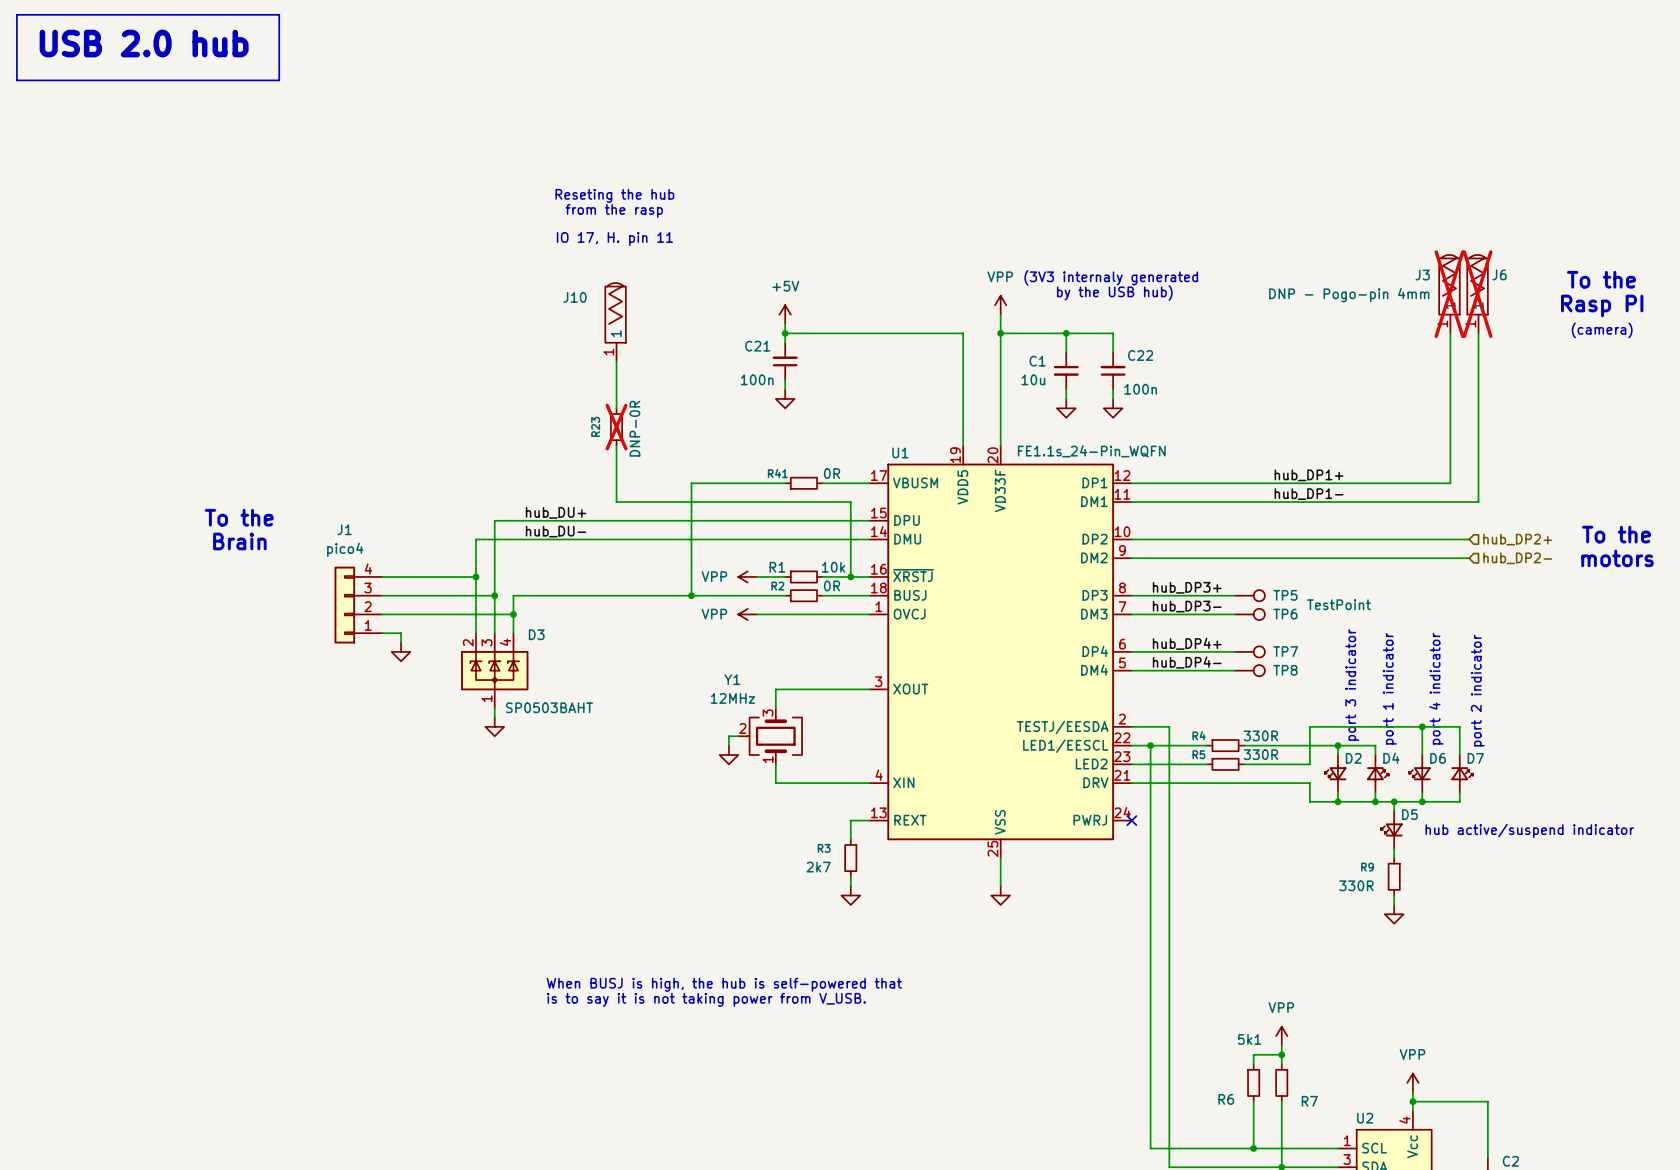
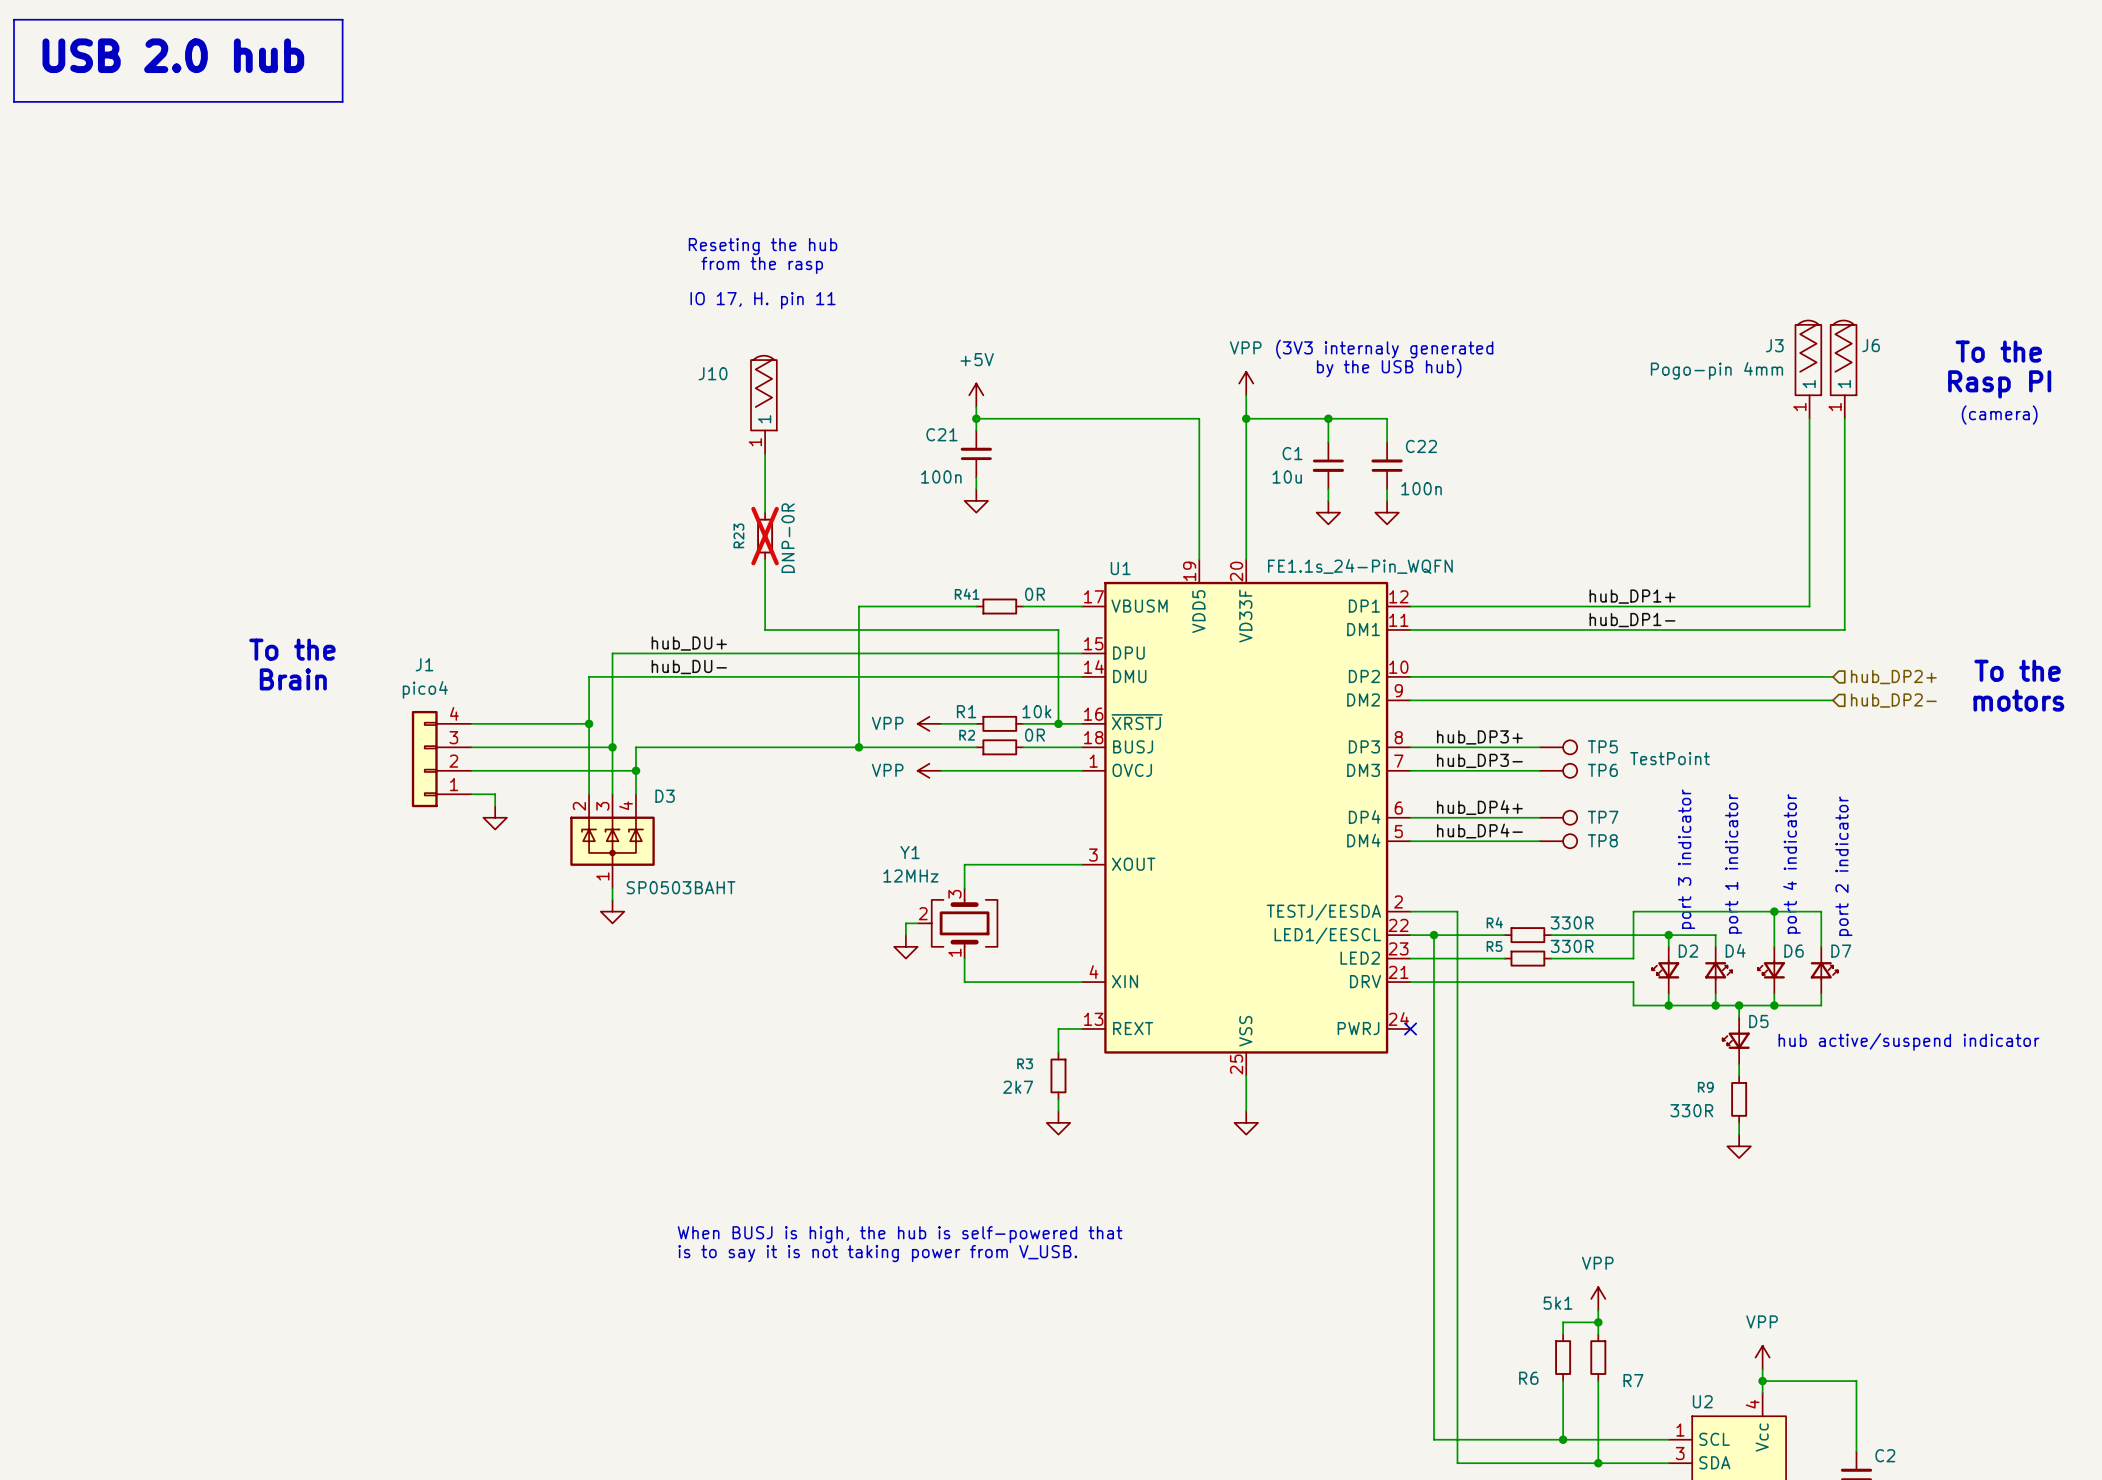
J3 do-not-place cross: (1449, 294) -> none
J6 do-not-place cross: (1477, 294) -> none
J3 value: DNP - Pogo-pin 4mm (1349, 295) -> Pogo-pin 4mm (1716, 370)

